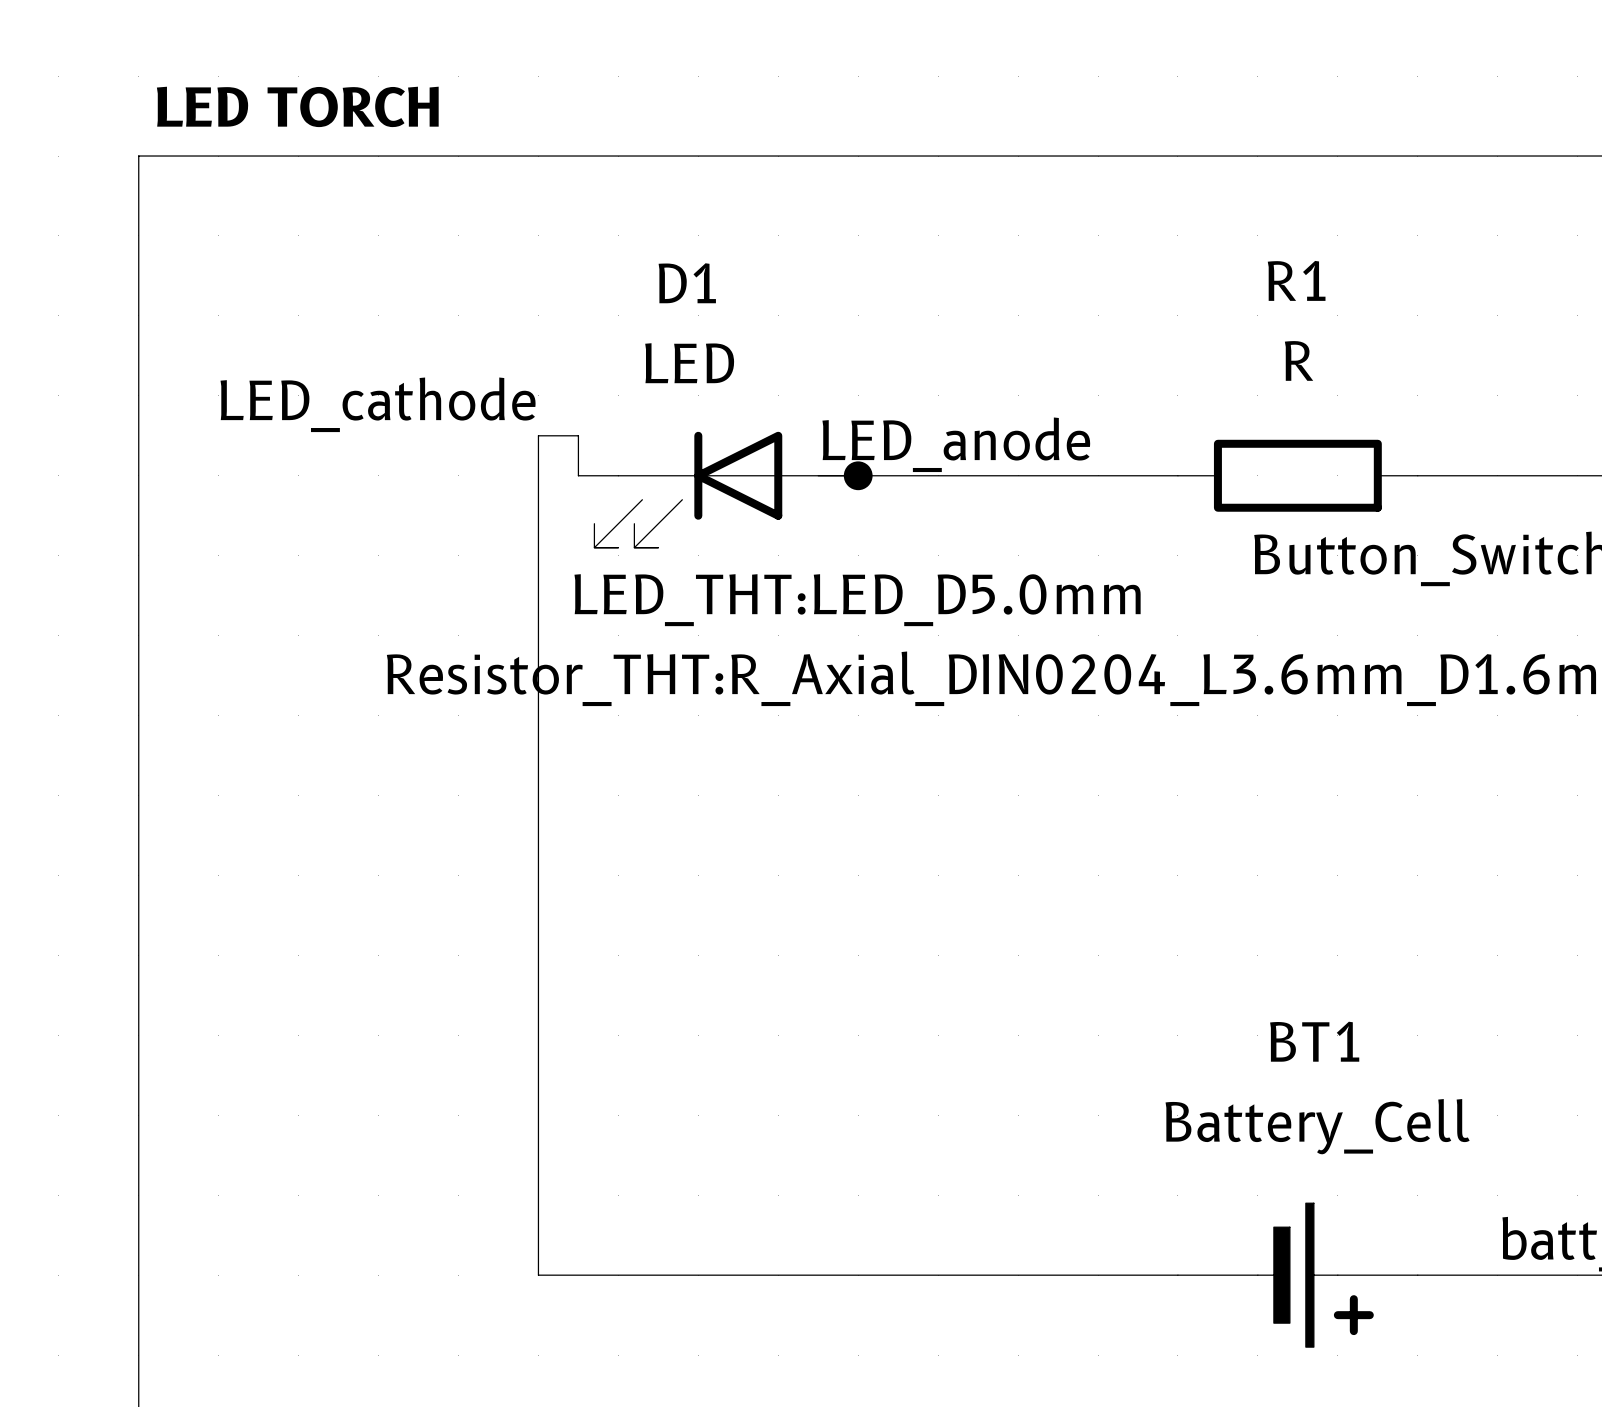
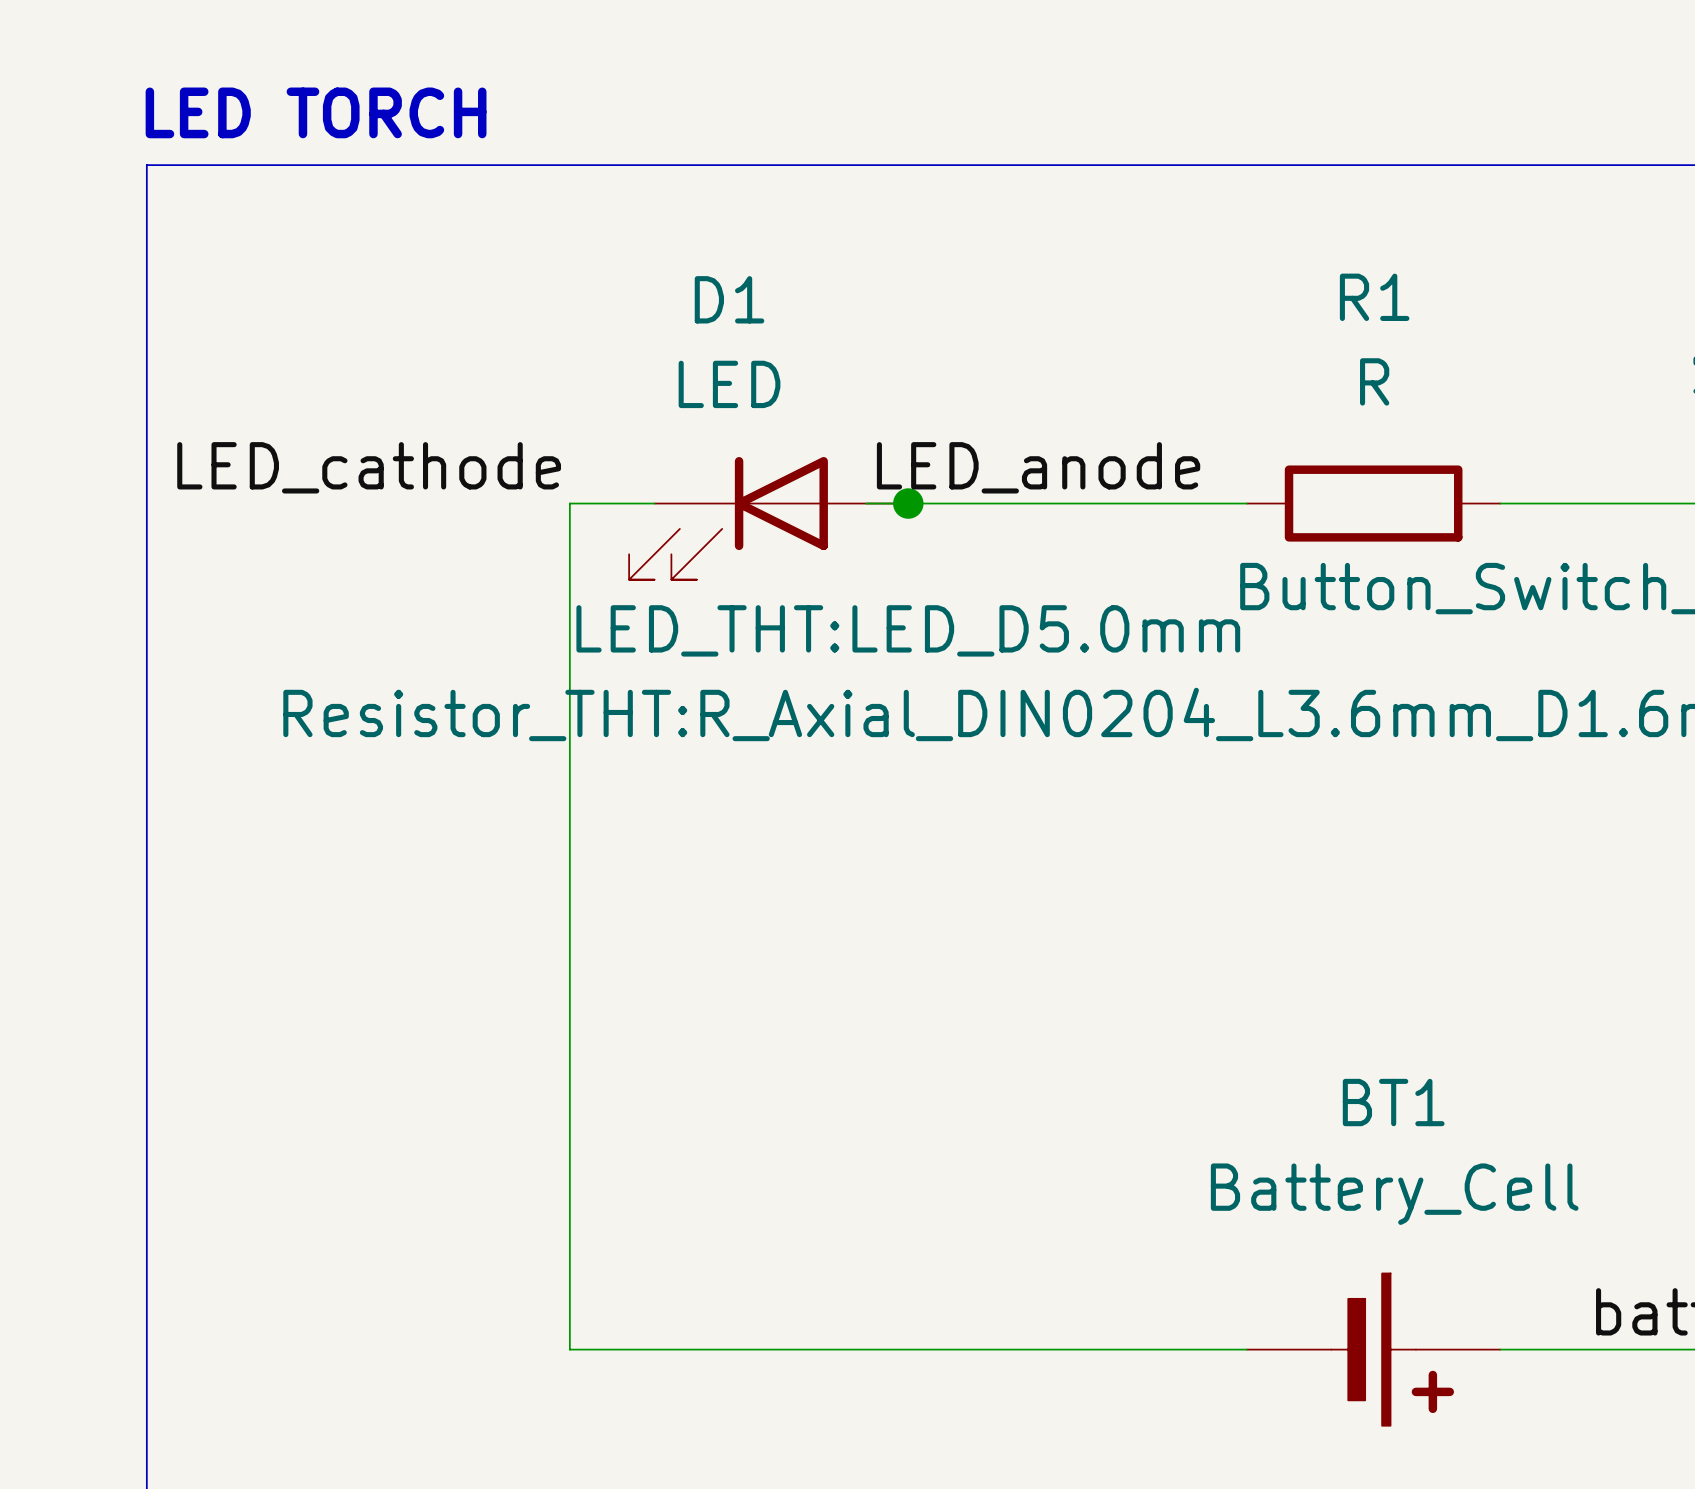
label position: LED_cathode (378, 404) -> LED_cathode (369, 467)
wire: (538, 475) (538, 435) (578, 435) (578, 475) -> (569, 503) (612, 503)

